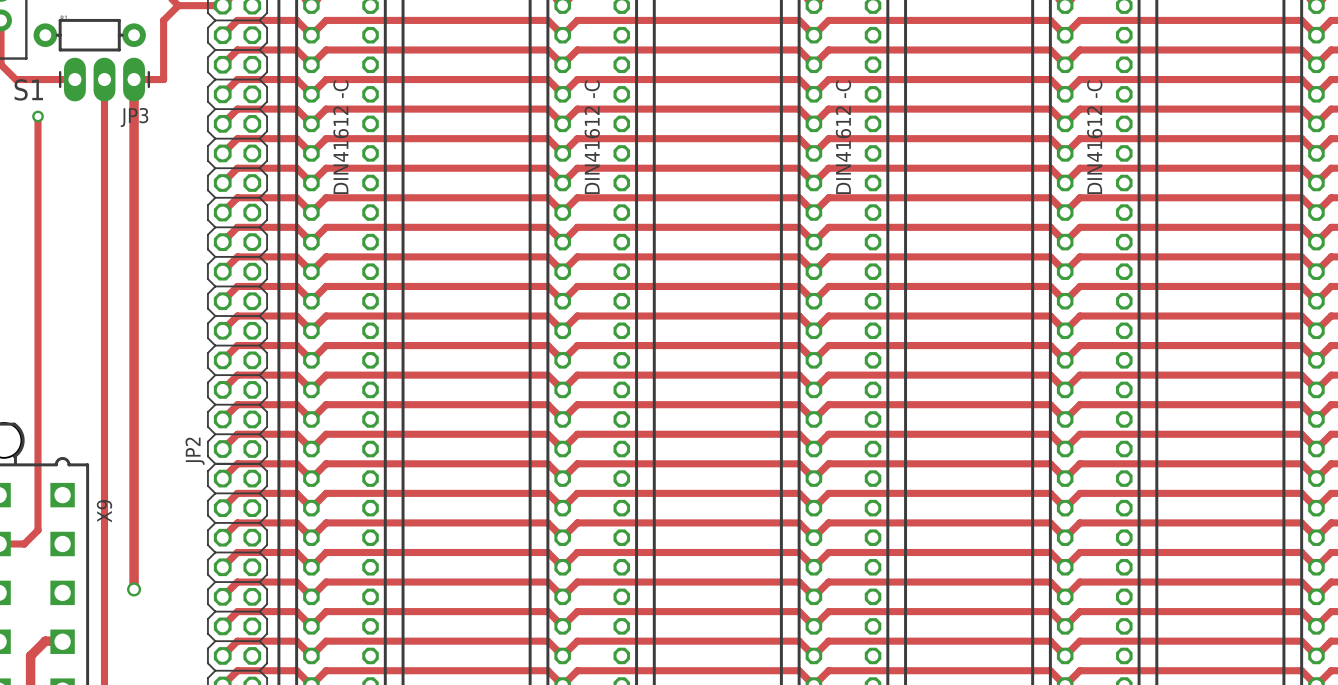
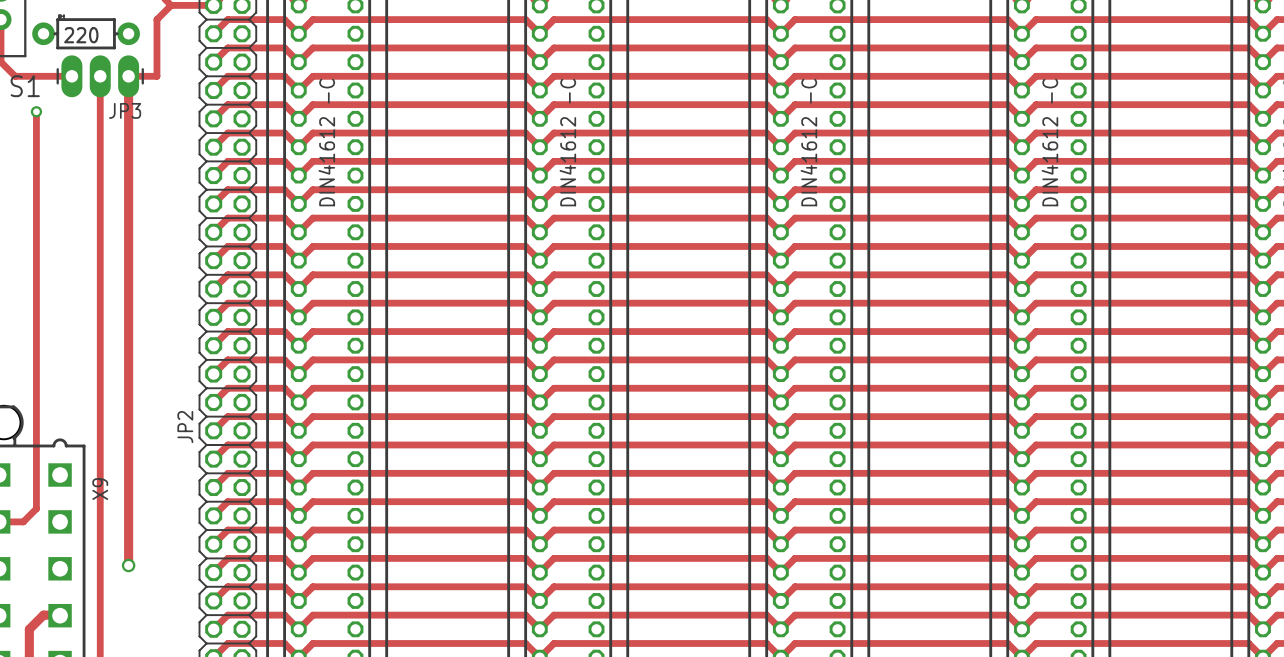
part value: none -> 220 (81, 35)

